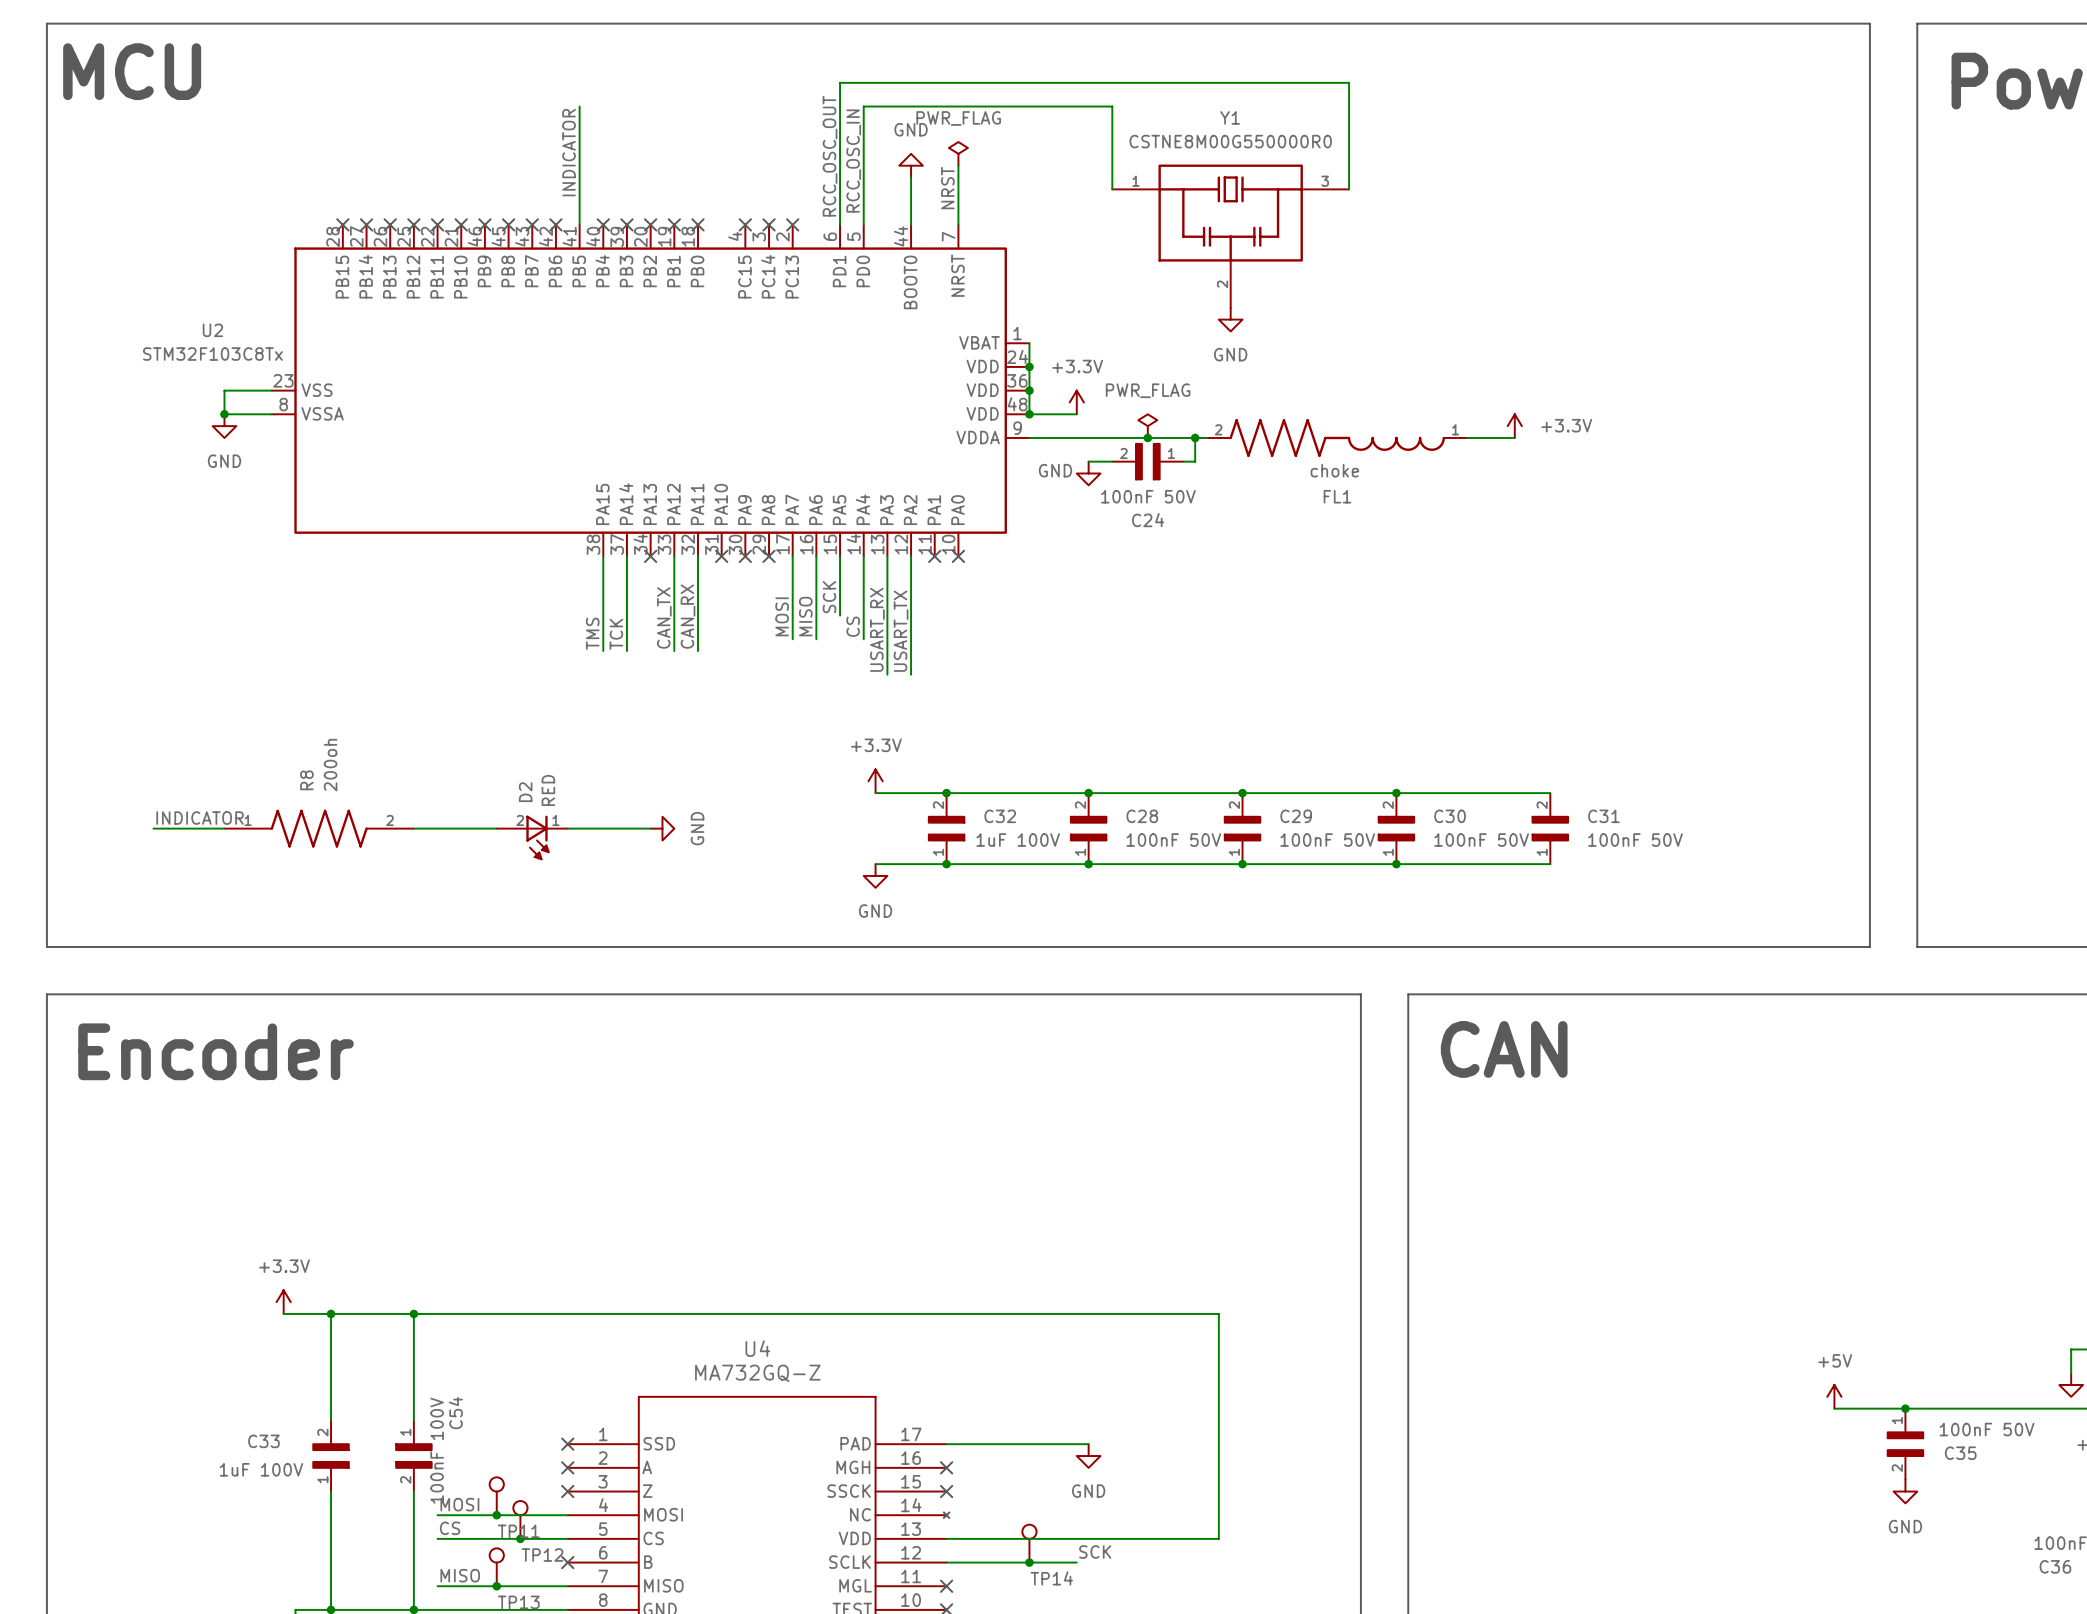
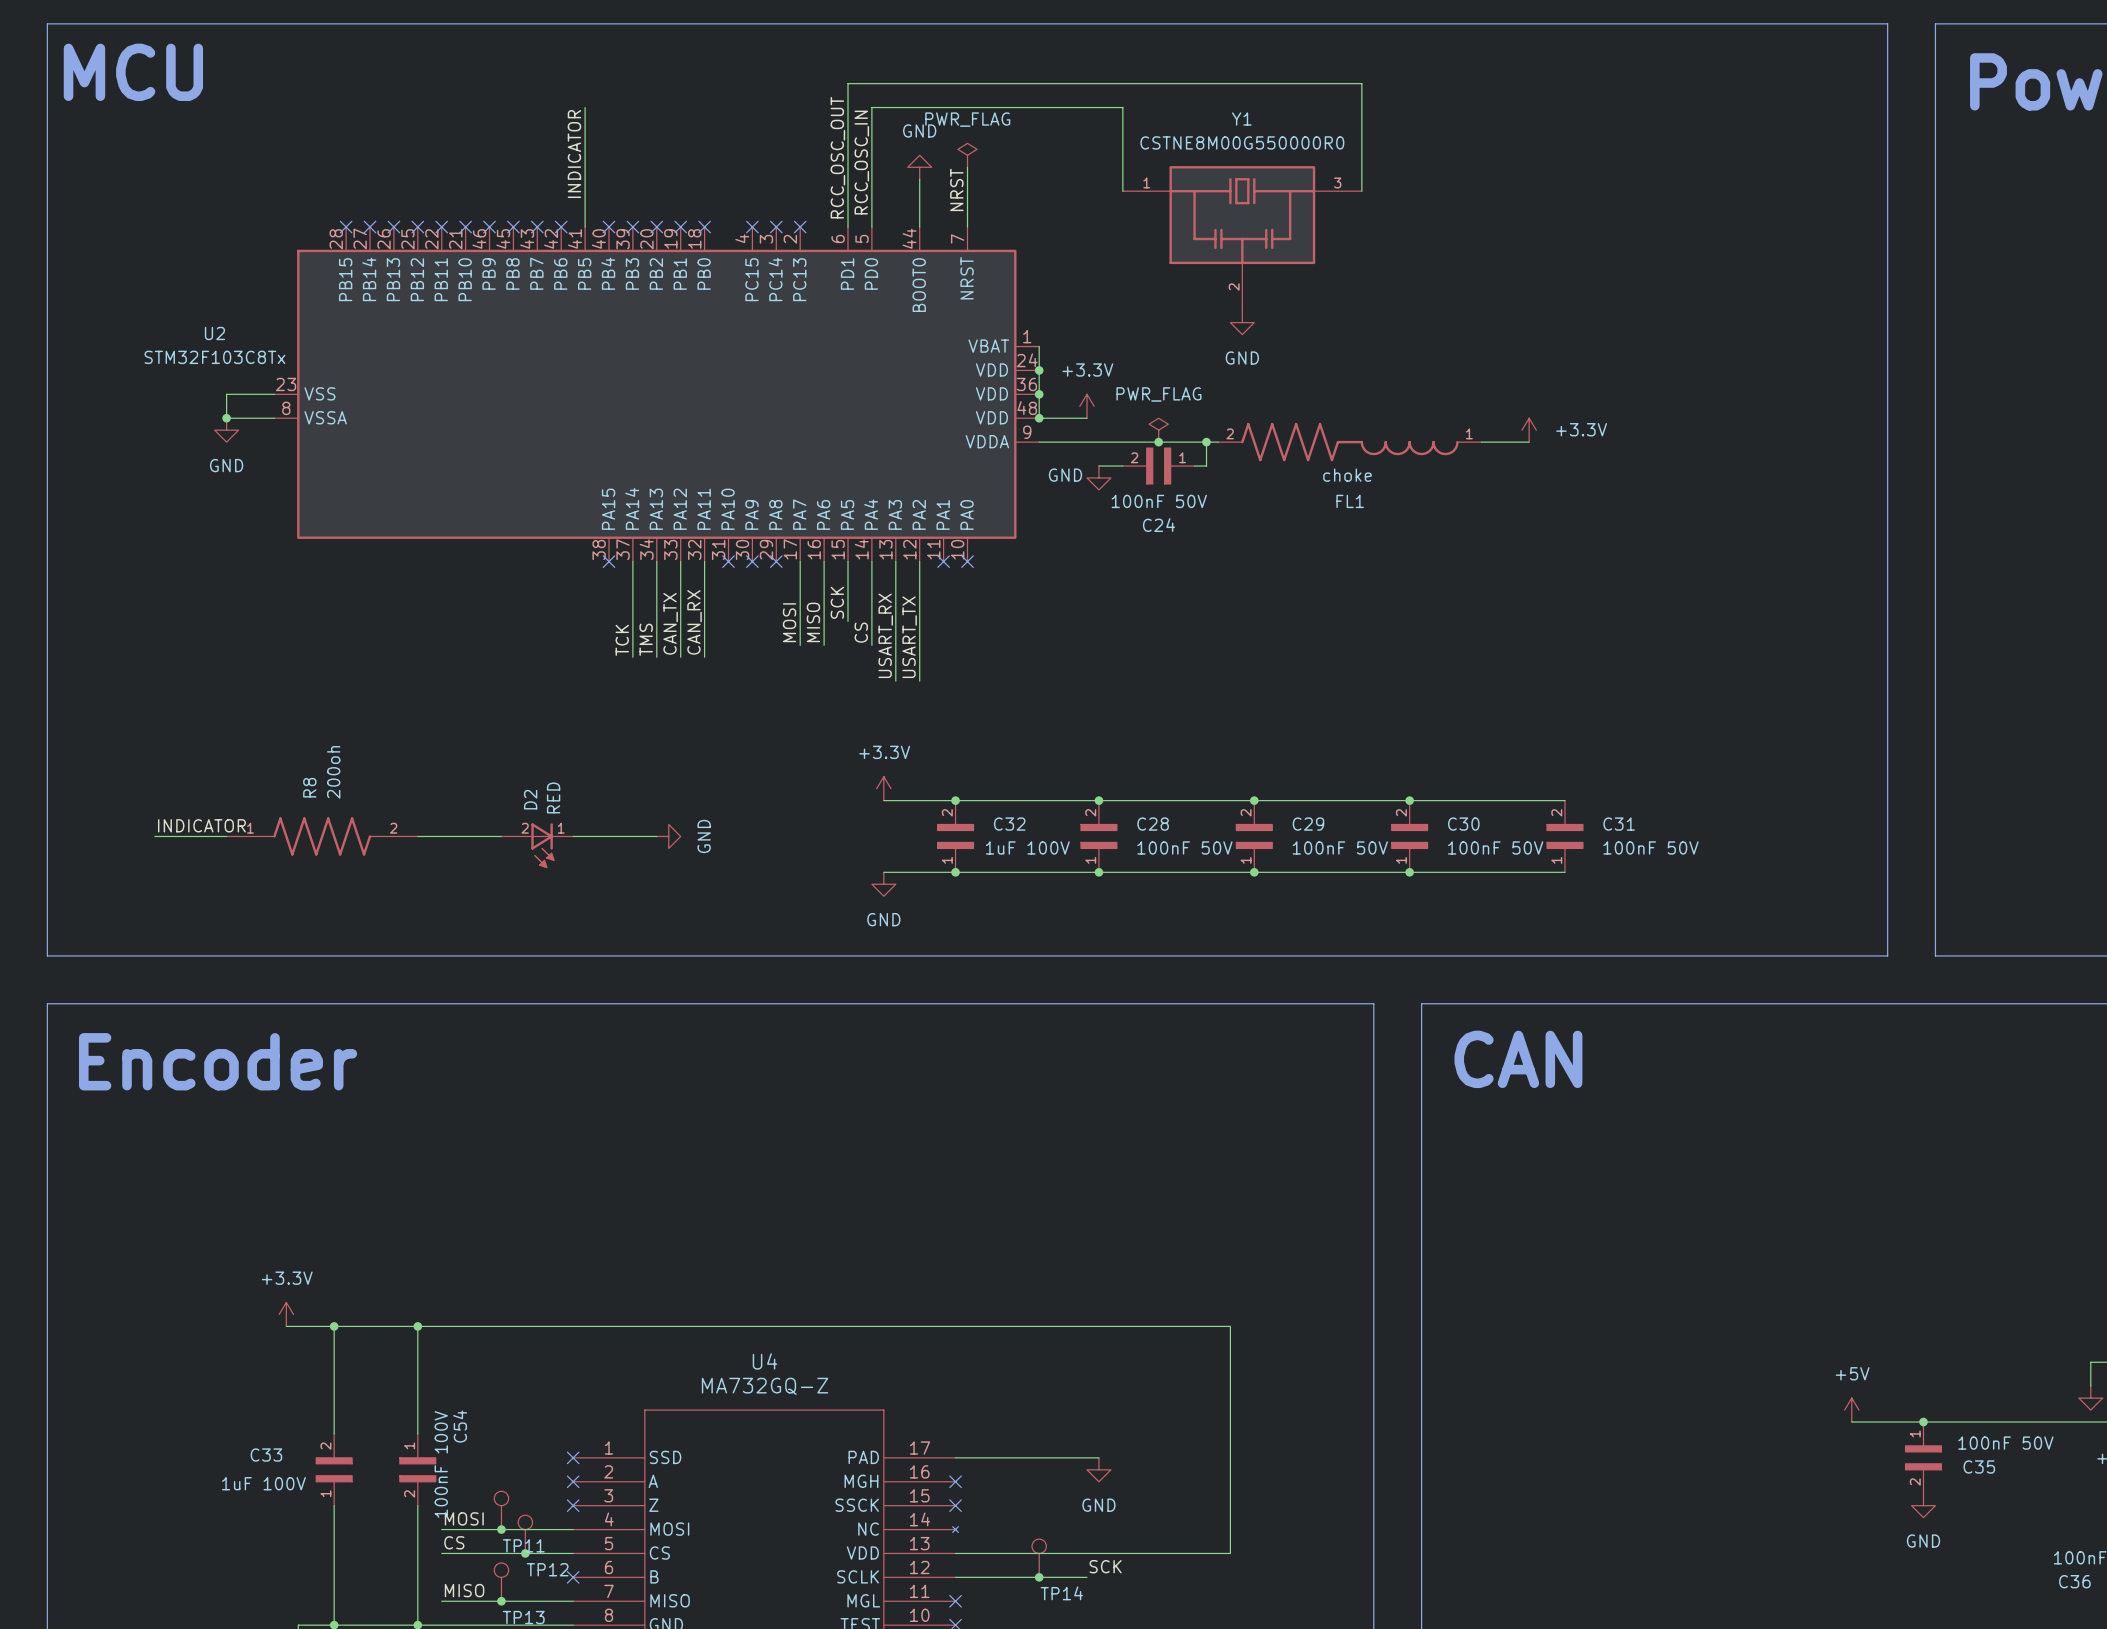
wire: (603, 556) (603, 651) -> (656, 561) (656, 657)
no-connect mark position: (650, 556) -> (609, 561)
label position: TMS (592, 633) -> TMS (646, 639)

